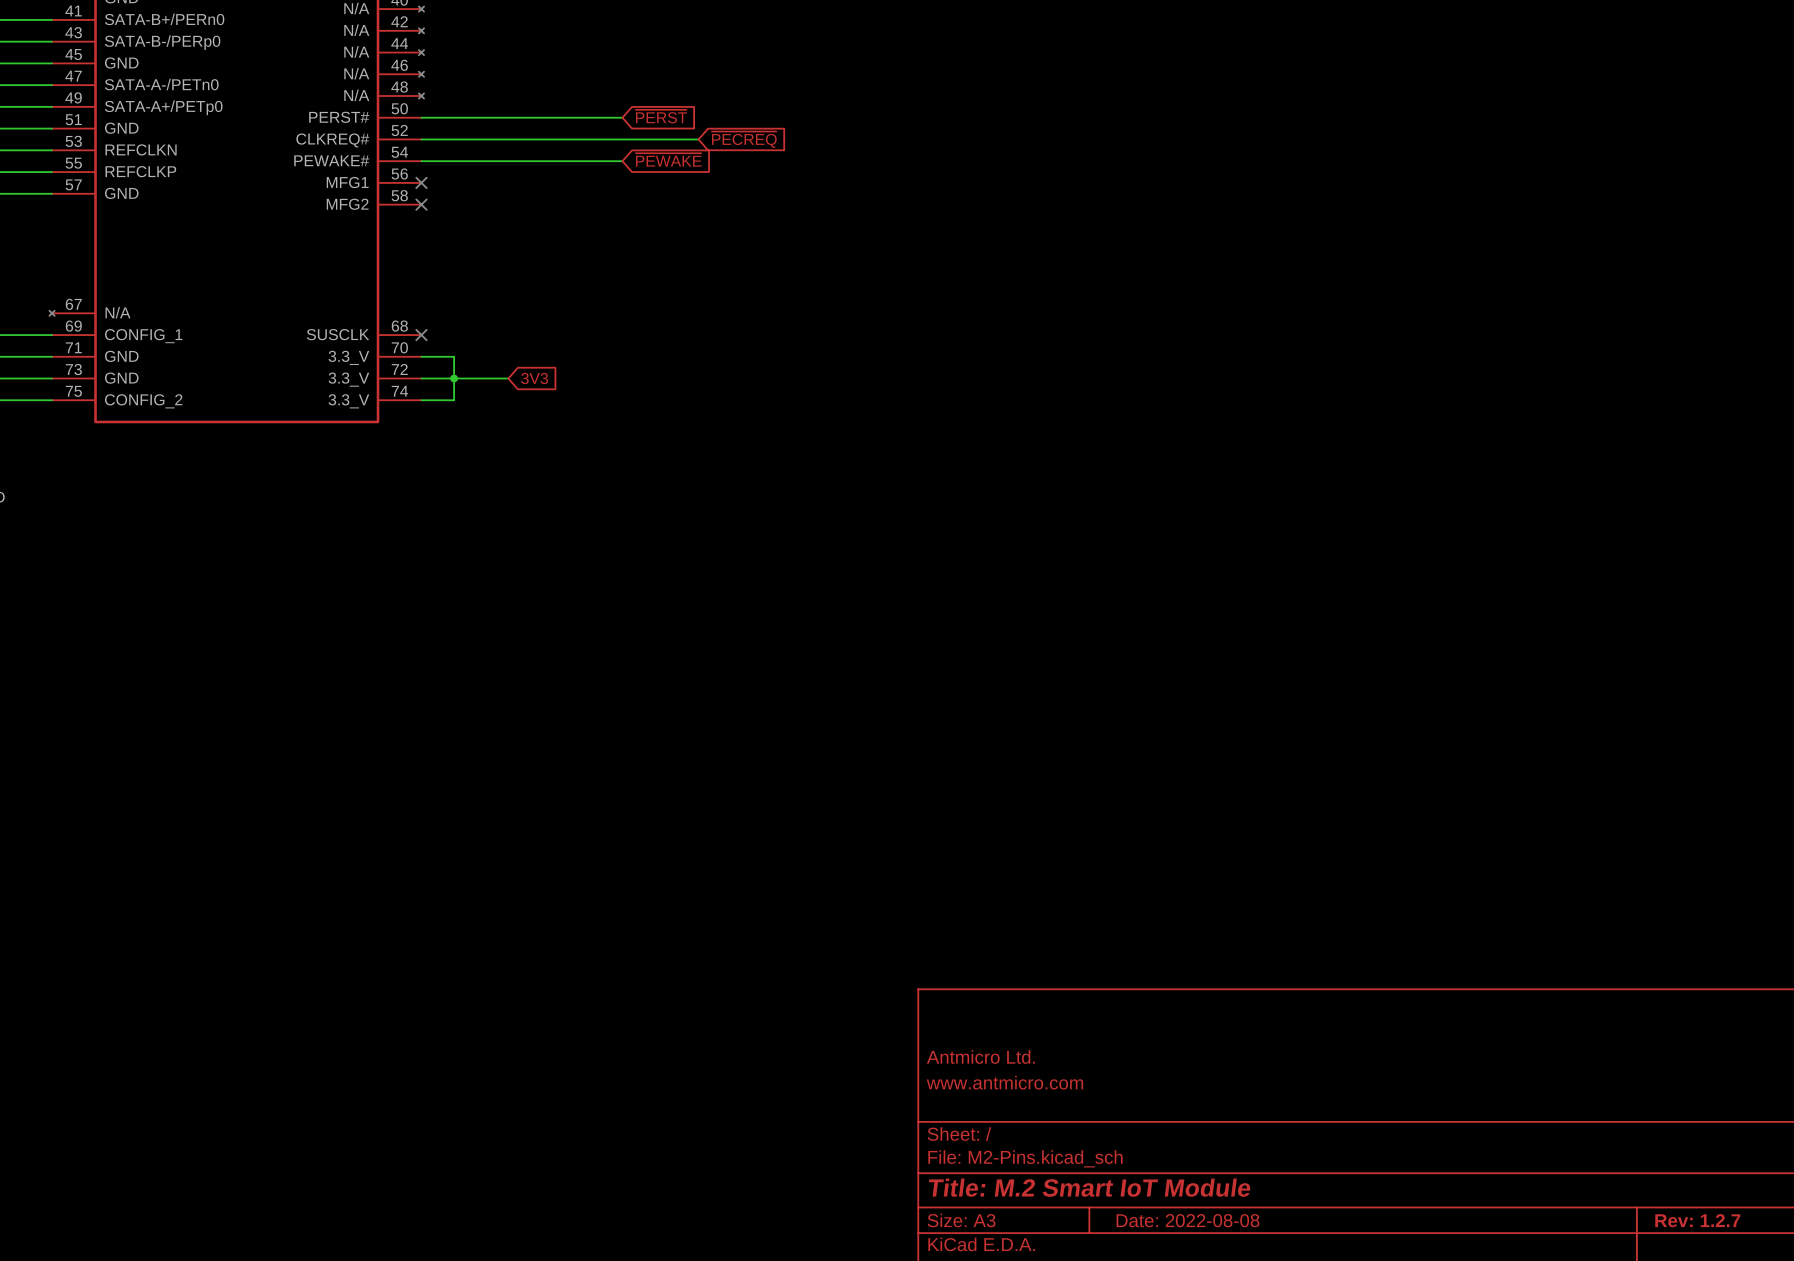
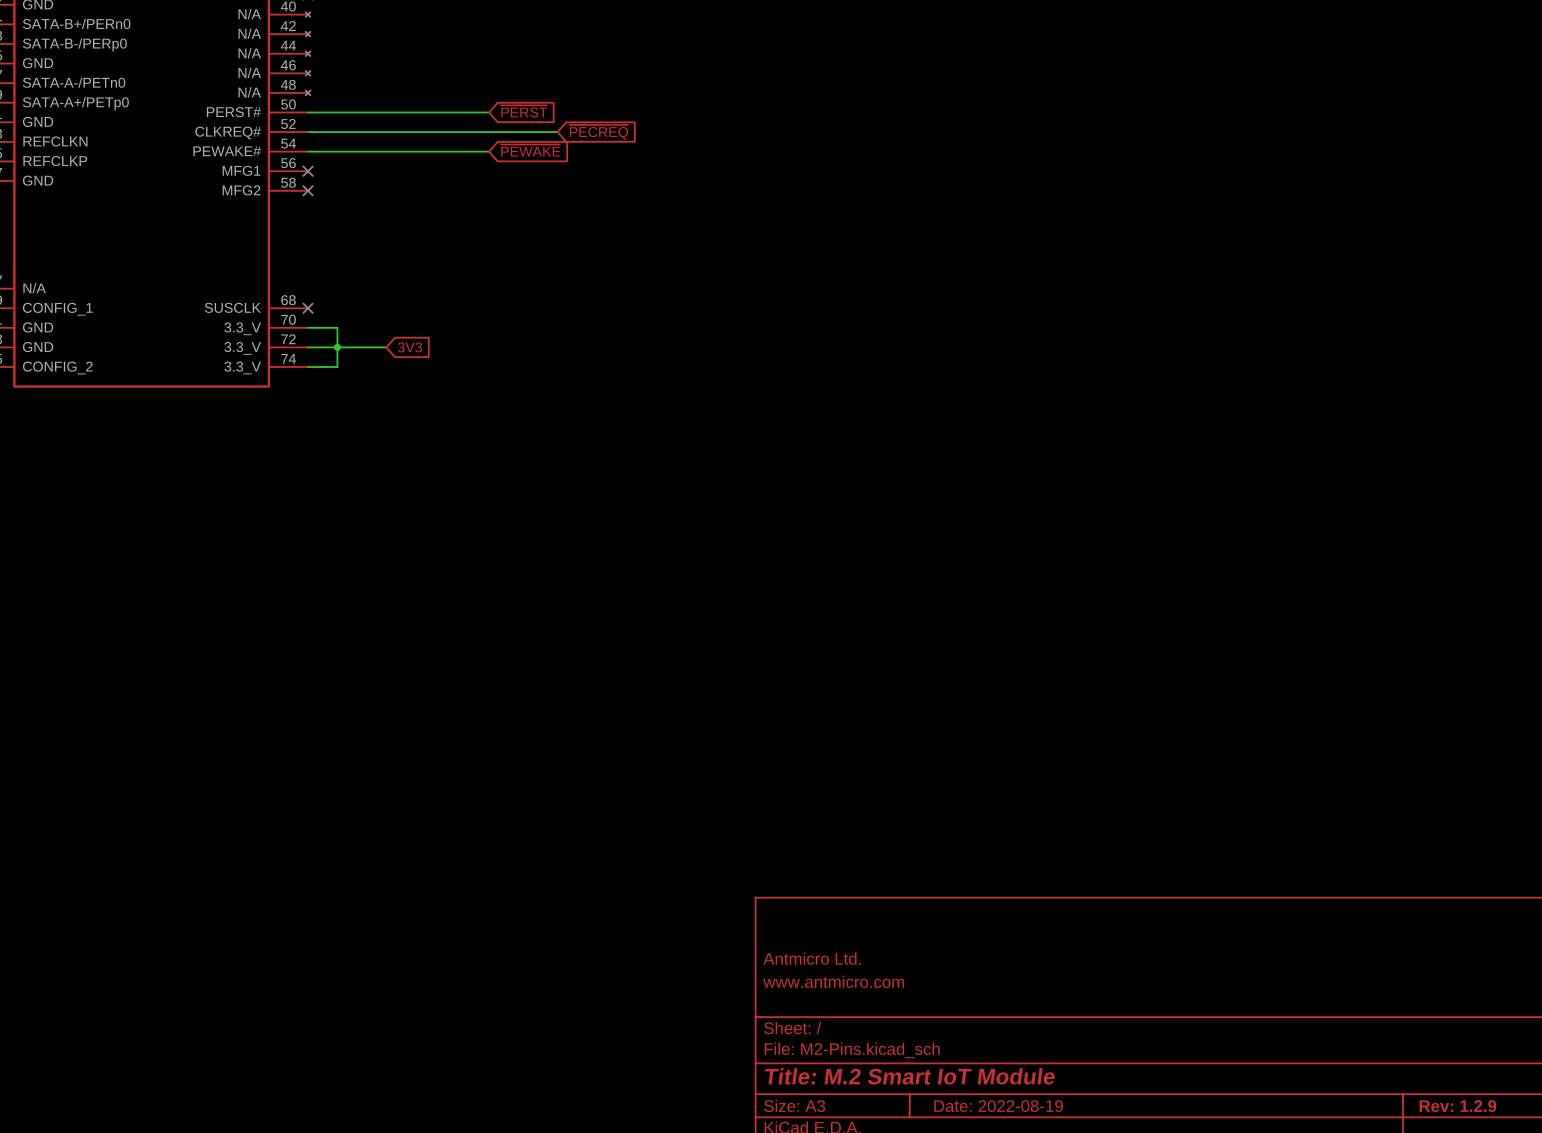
title block: Date: 2022-08-08 (1187, 1220) -> Date: 2022-08-19 (998, 1106)
title block: Rev: 1.2.7 (1697, 1220) -> Rev: 1.2.9 (1457, 1106)

